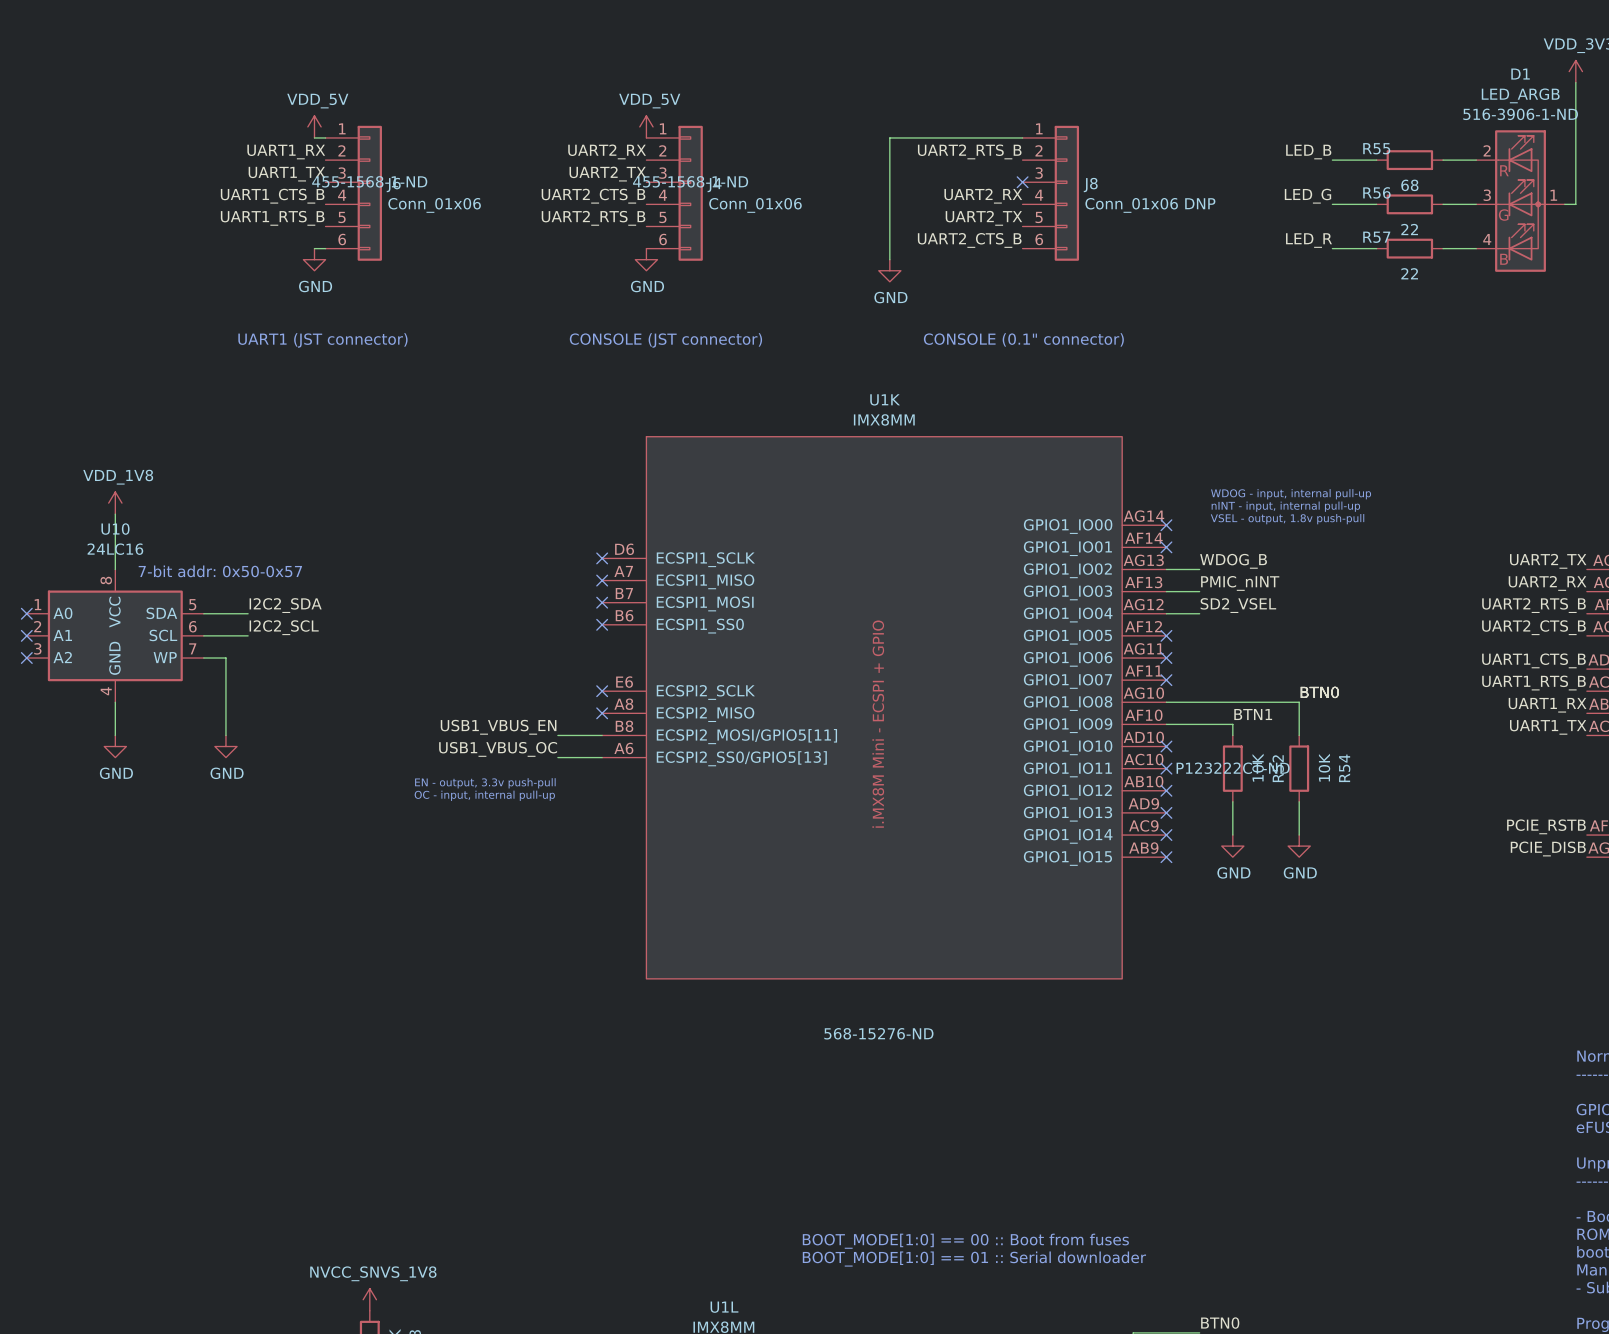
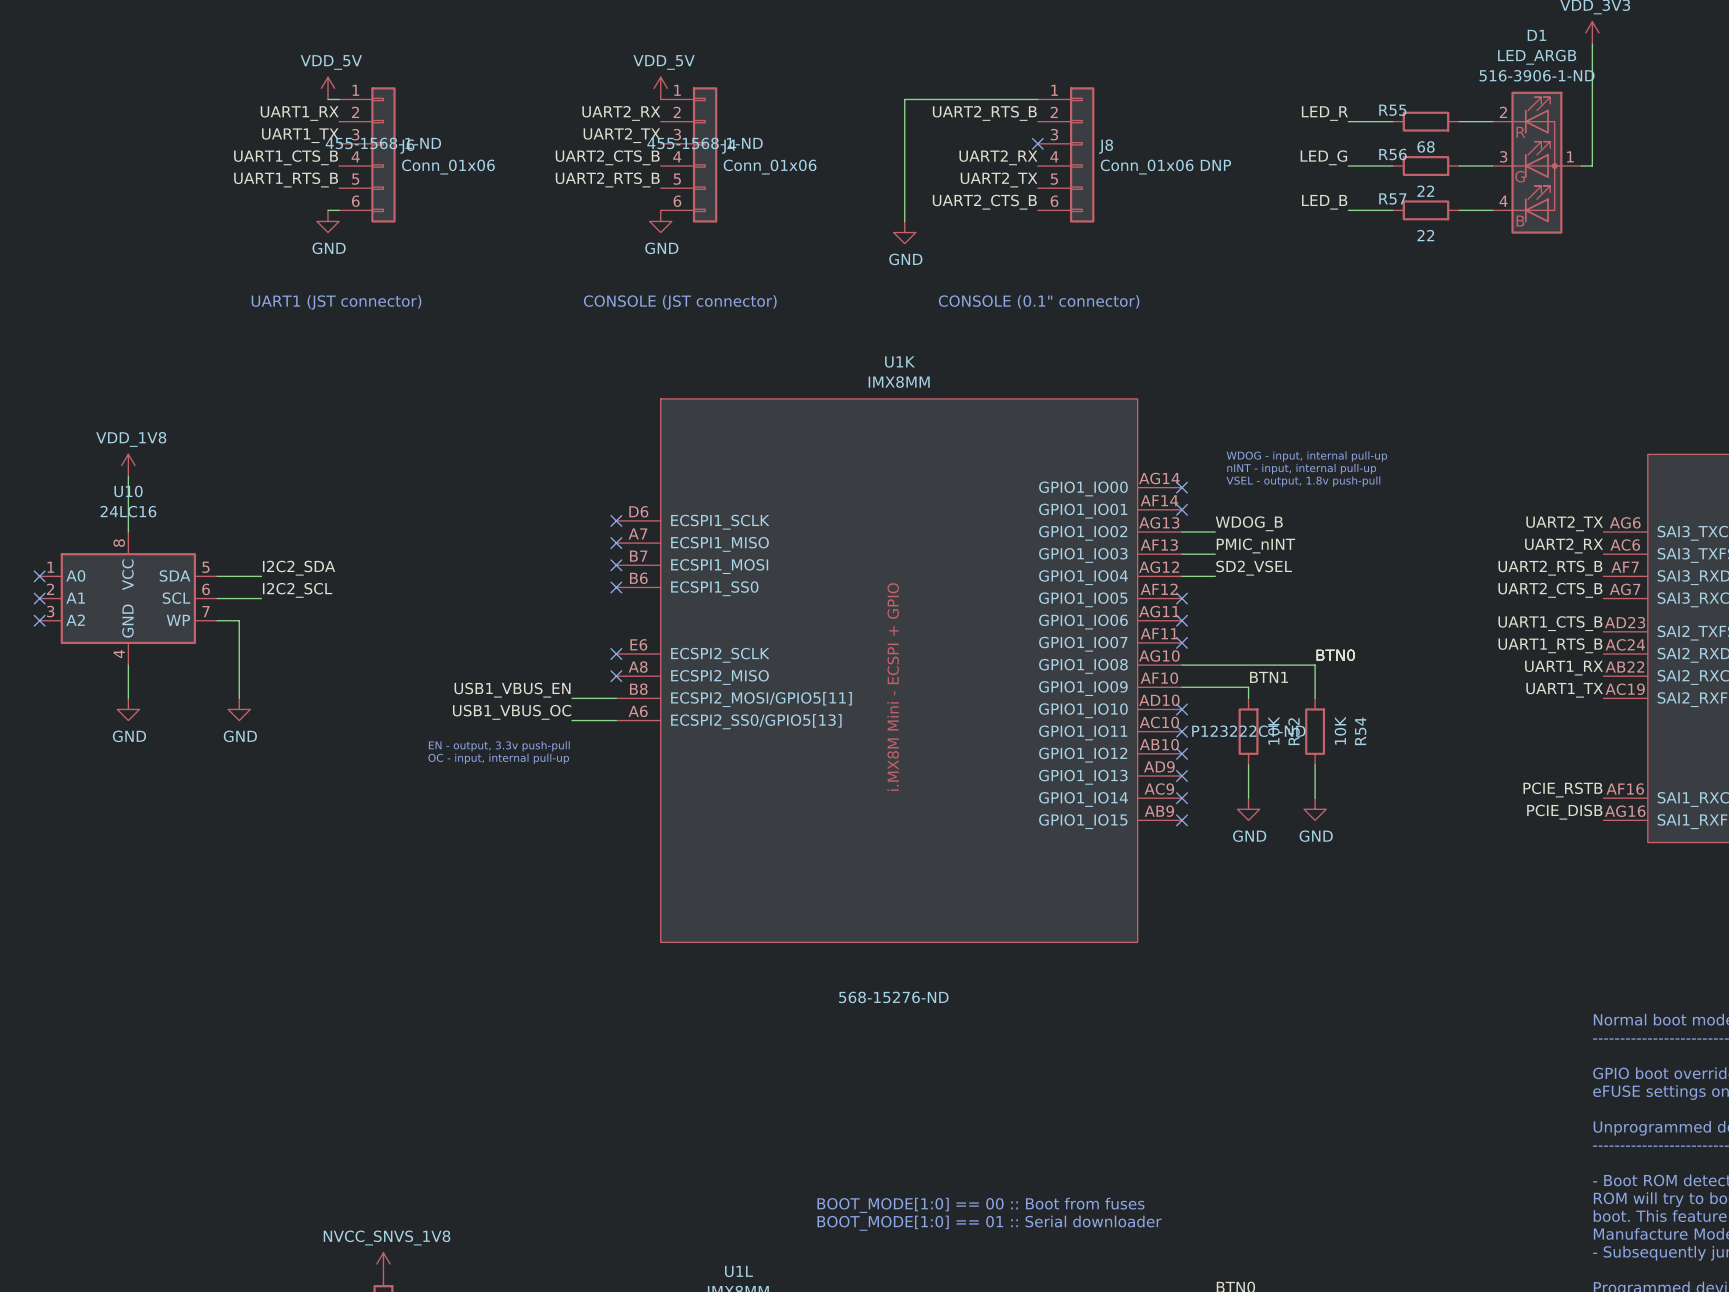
label: LED_B (1308, 152) -> LED_R (1324, 113)
label: LED_R (1309, 240) -> LED_B (1324, 202)
text: 7-bit addr: 0x50-0x57 (220, 571) -> none

